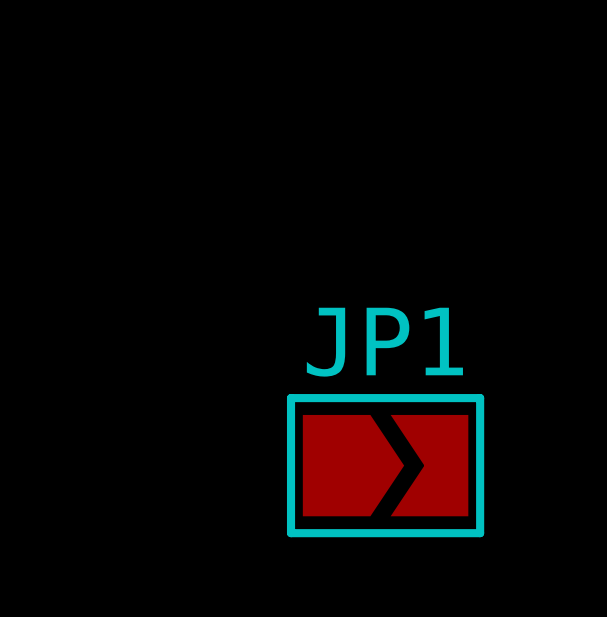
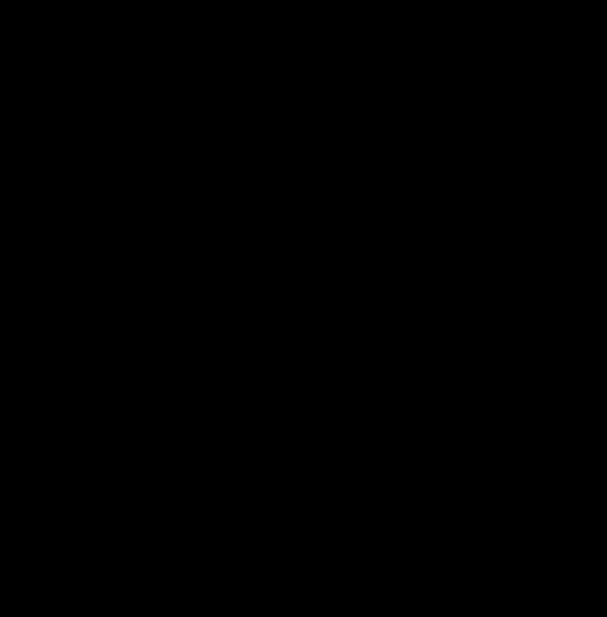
JP1: (385, 465) -> none

